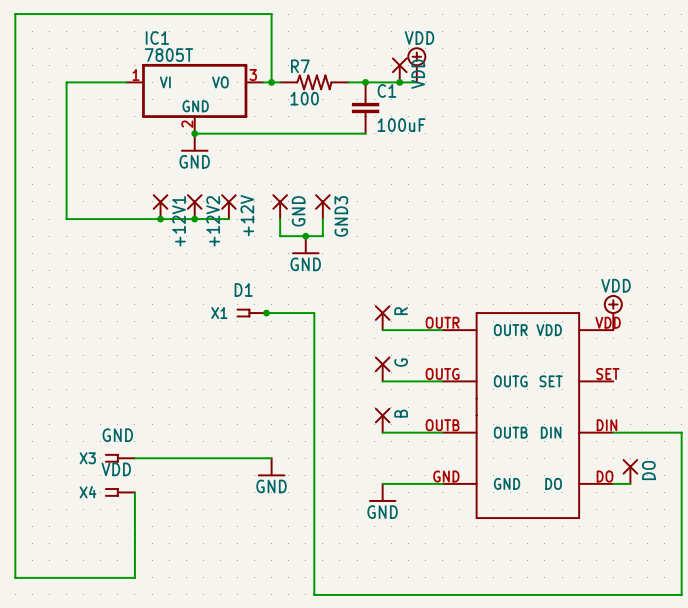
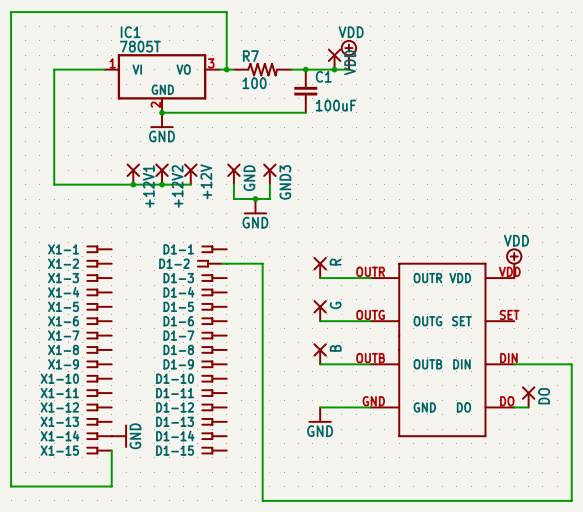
X1 value: D1 (243, 289) -> none
X1-1: none -> (99, 249)
D1-1: none -> (214, 249)
X1-2: none -> (99, 263)
X1 name: X1 (219, 313) -> D1-2 (174, 263)
junction: (266, 313) -> none
X1-3: none -> (99, 278)
D1-3: none -> (214, 278)
X1-4: none -> (99, 292)
D1-4: none -> (214, 292)
X1-5: none -> (99, 306)
D1-5: none -> (214, 306)
X1-6: none -> (99, 321)
D1-6: none -> (214, 321)
X1-7: none -> (99, 335)
D1-7: none -> (214, 335)
X1-8: none -> (99, 349)
D1-8: none -> (214, 349)
X1-9: none -> (99, 364)
D1-9: none -> (214, 364)
X1-10: none -> (99, 378)
D1-10: none -> (214, 378)
X3: GND (119, 458) -> none
wire: (134, 458) (271, 458) -> none
X1-11: none -> (99, 393)
D1-11: none -> (214, 393)
power symbol position: GND (271, 467) -> GND (119, 436)
power symbol rotation: 0° (271, 475) -> 90° counterclockwise (126, 436)
X1-12: none -> (99, 407)
D1-12: none -> (214, 407)
X4: VDD (119, 492) -> none
wire: (134, 492) (134, 535) -> none
X1-13: none -> (99, 421)
D1-13: none -> (214, 421)
X1-14: none -> (99, 436)
D1-14: none -> (214, 436)
X1-15: none -> (99, 450)
D1-15: none -> (214, 450)

